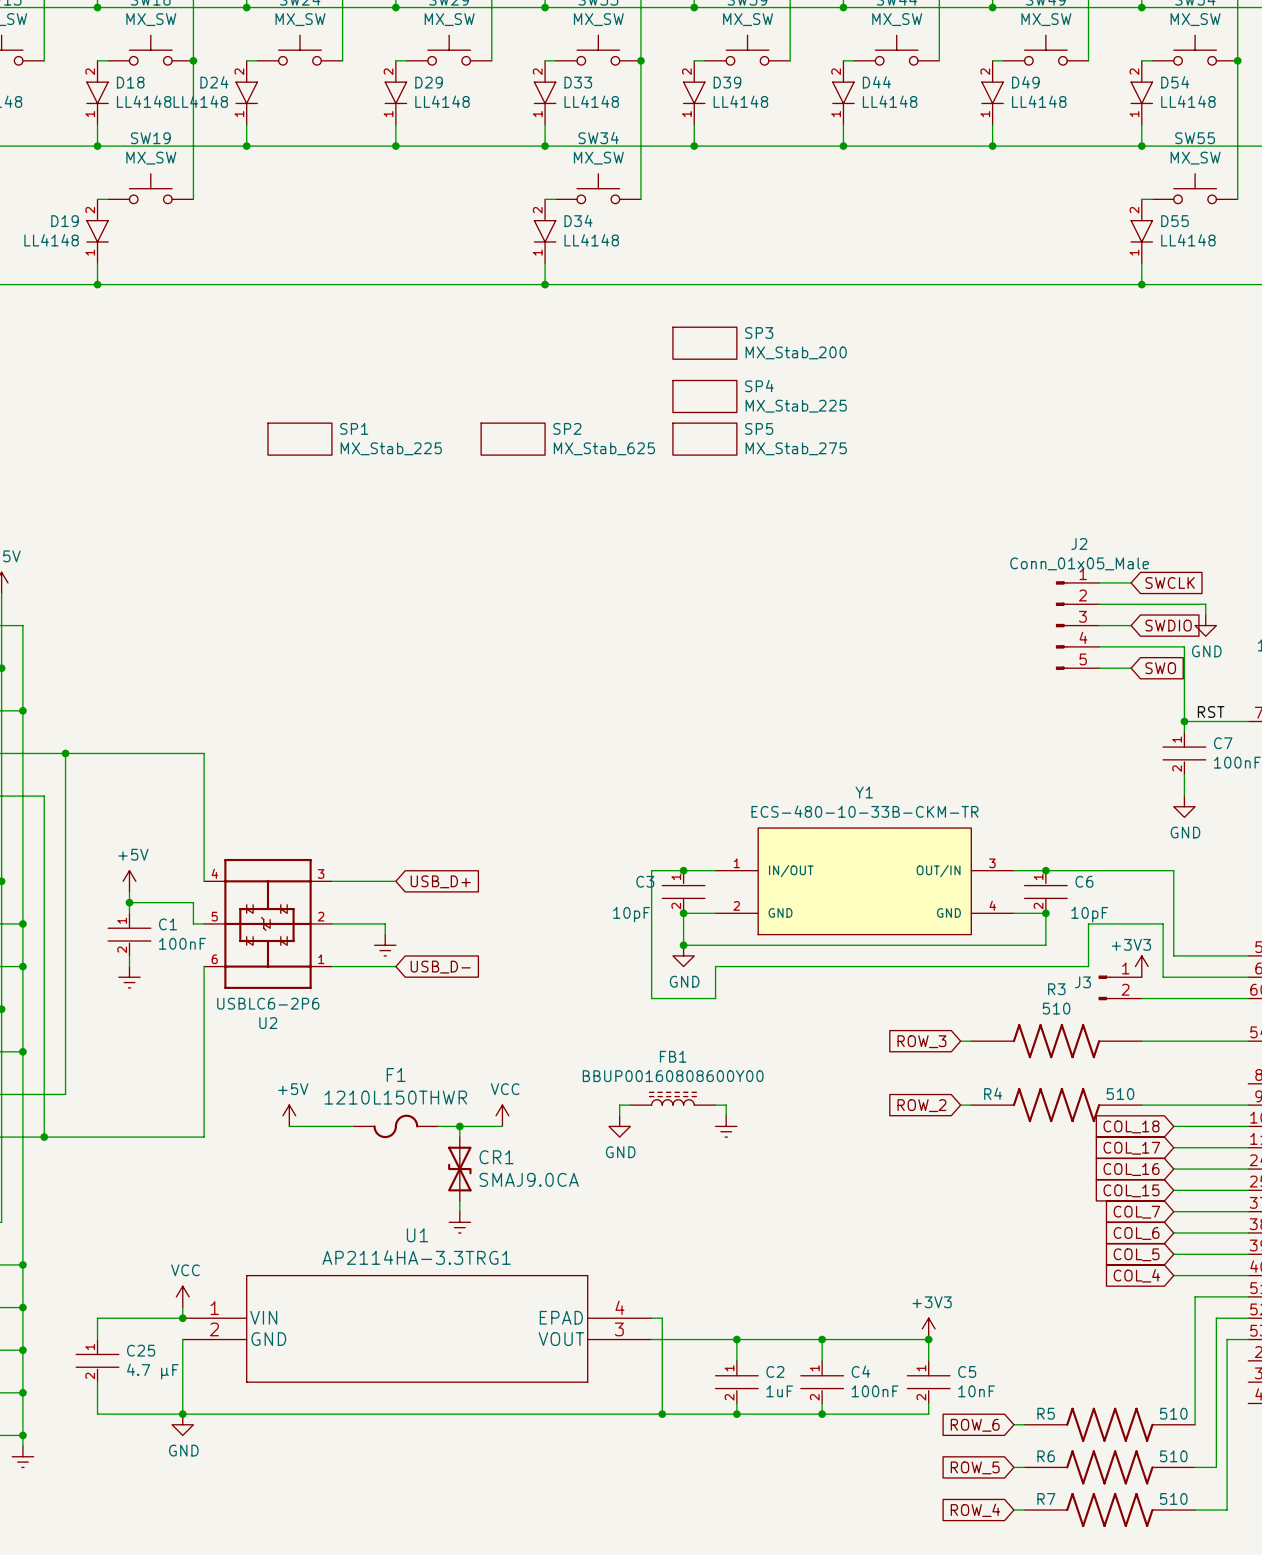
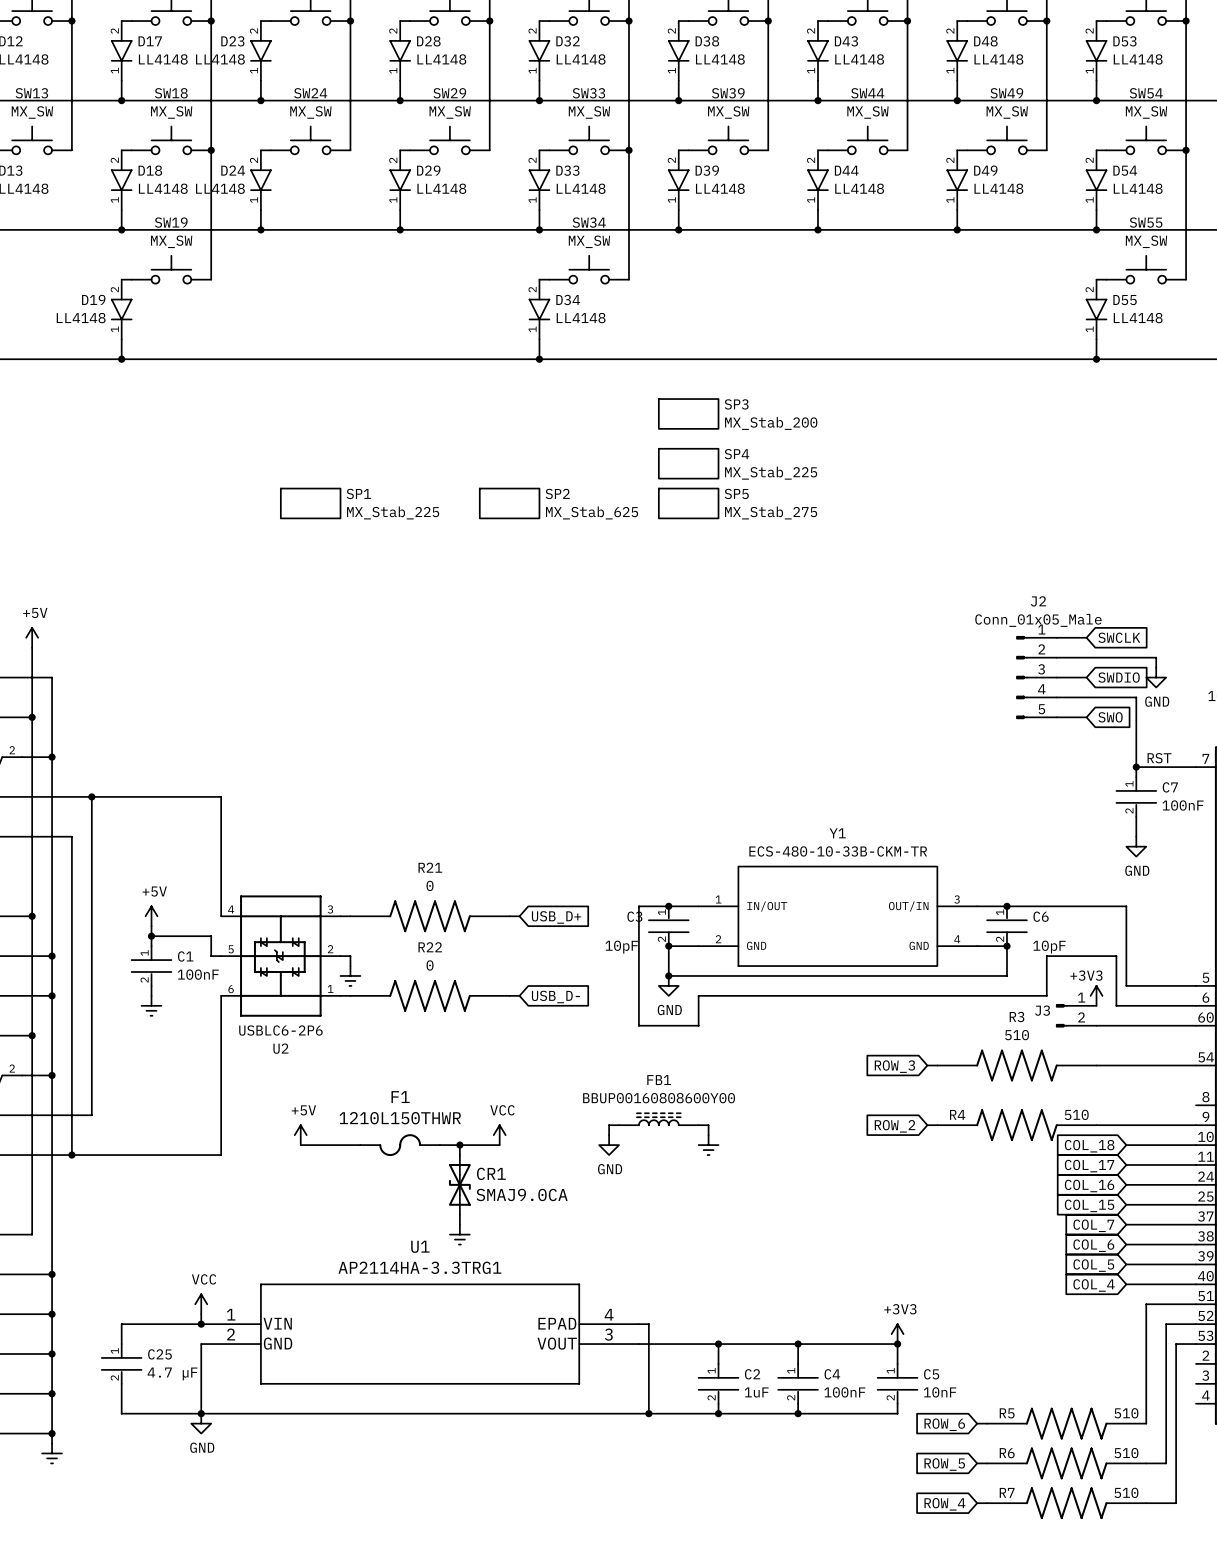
R21: none -> (430, 916)
global label position: USB_D+ (440, 881) -> USB_D+ (556, 917)
wire: none -> (509, 916) (519, 916)
wire: (342, 923) (385, 923) (385, 934) -> (350, 956) (350, 966)
power symbol position: (385, 945) -> (350, 975)
R22: none -> (430, 995)
wire: none -> (509, 995) (519, 995)
global label position: USB_D- (440, 967) -> USB_D- (555, 996)

